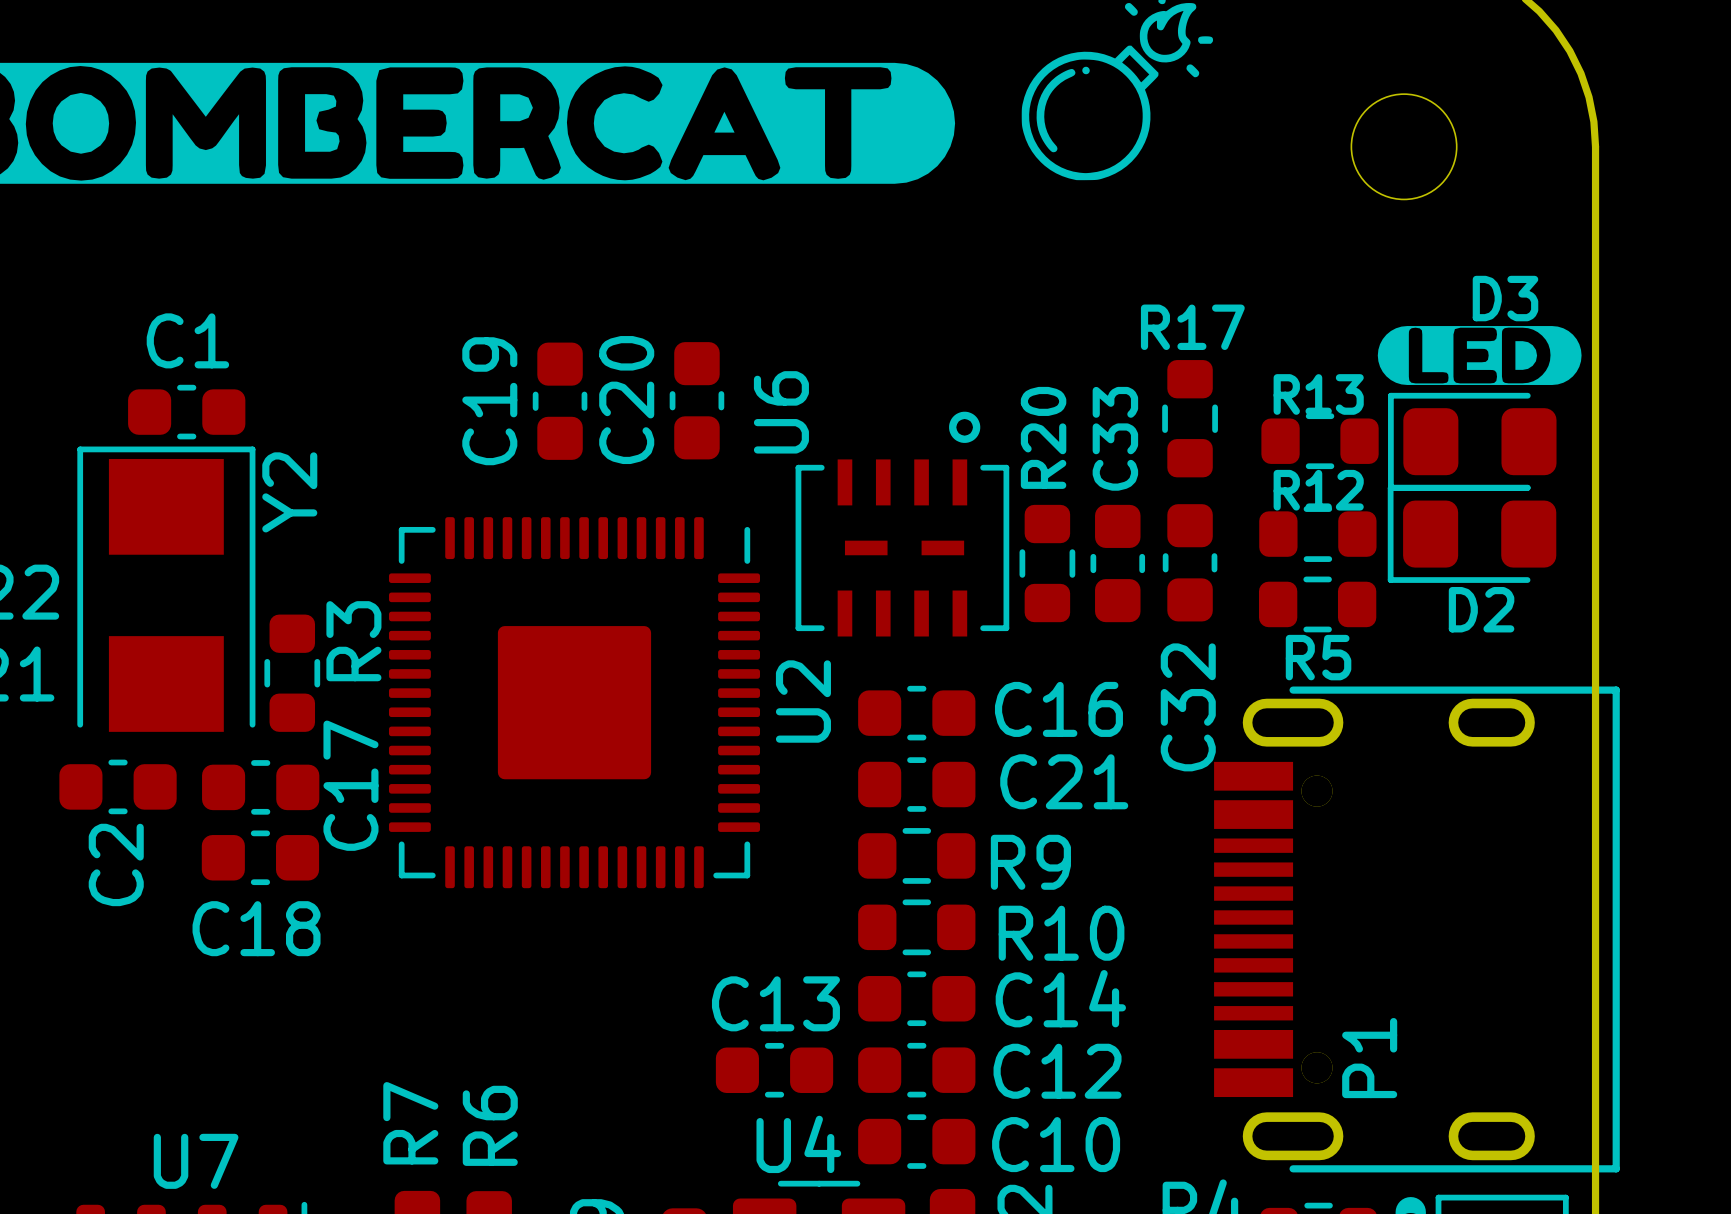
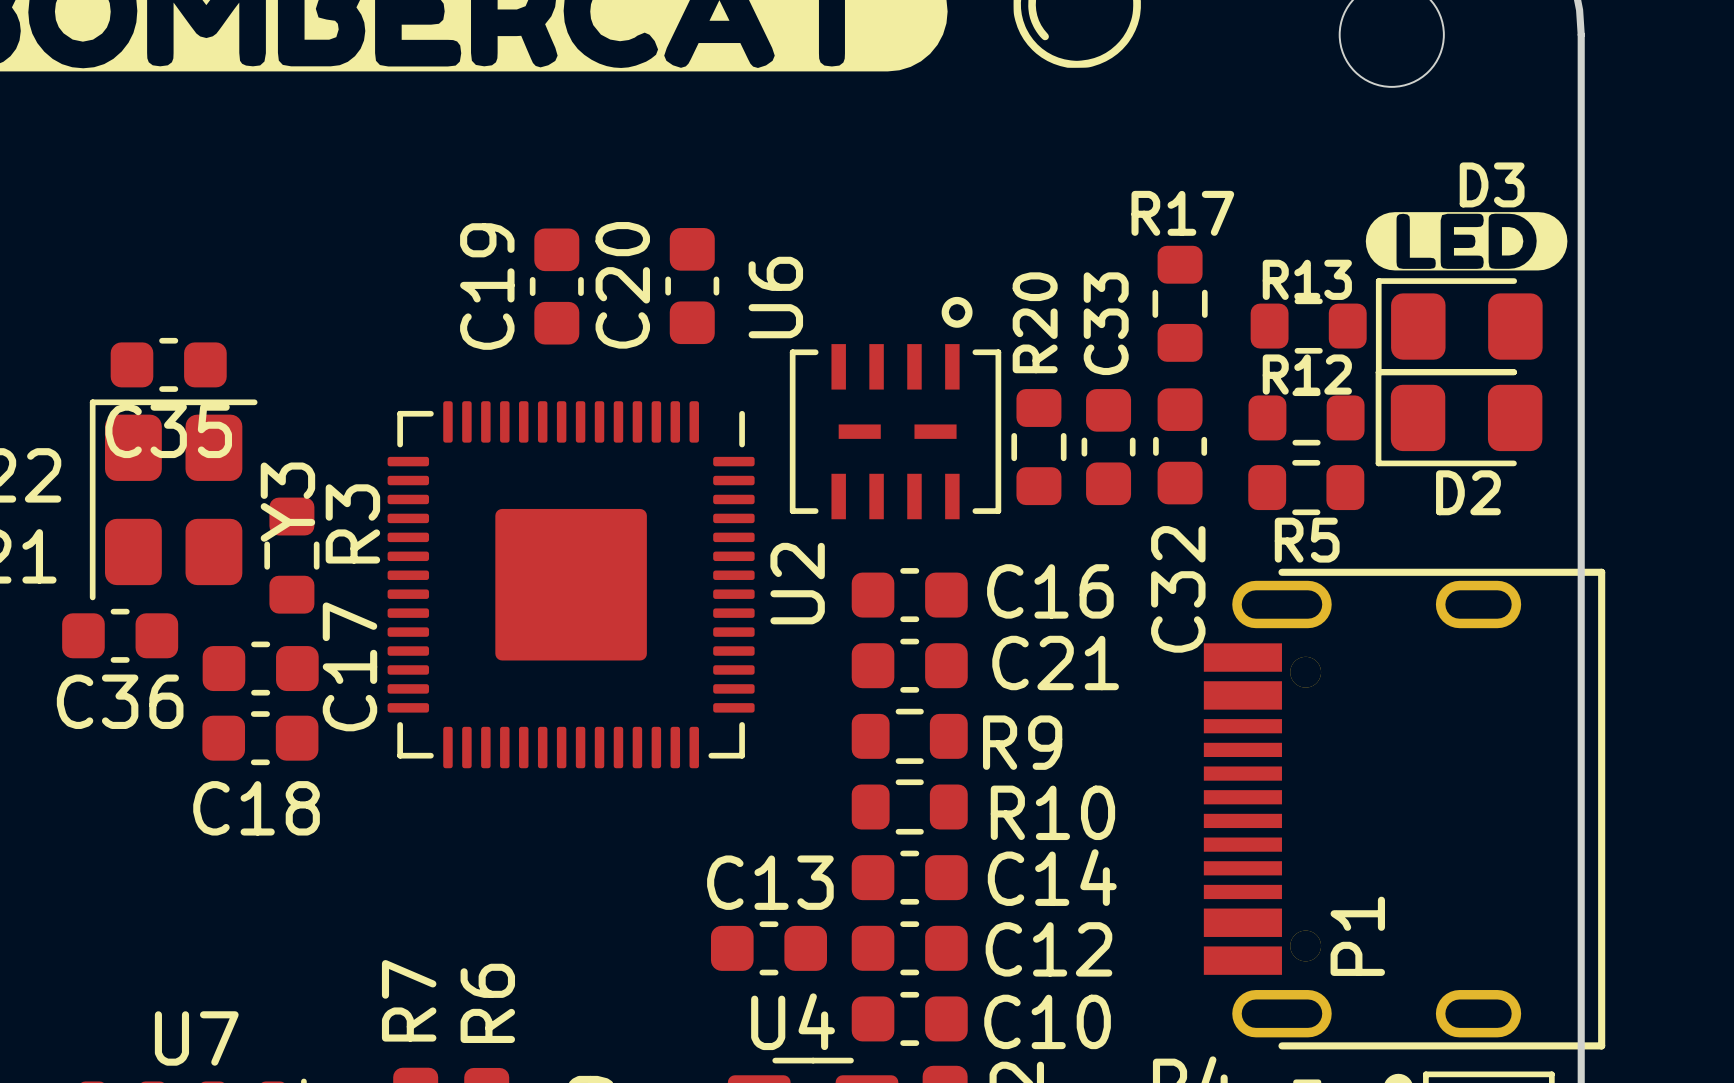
C1: (186, 412) -> none
C35: none -> (168, 364)
Y2: (166, 589) -> none
Y3: none -> (173, 499)
C2 position: (118, 786) -> (120, 635)
C2 name: C2 (116, 864) -> C36 (120, 701)

